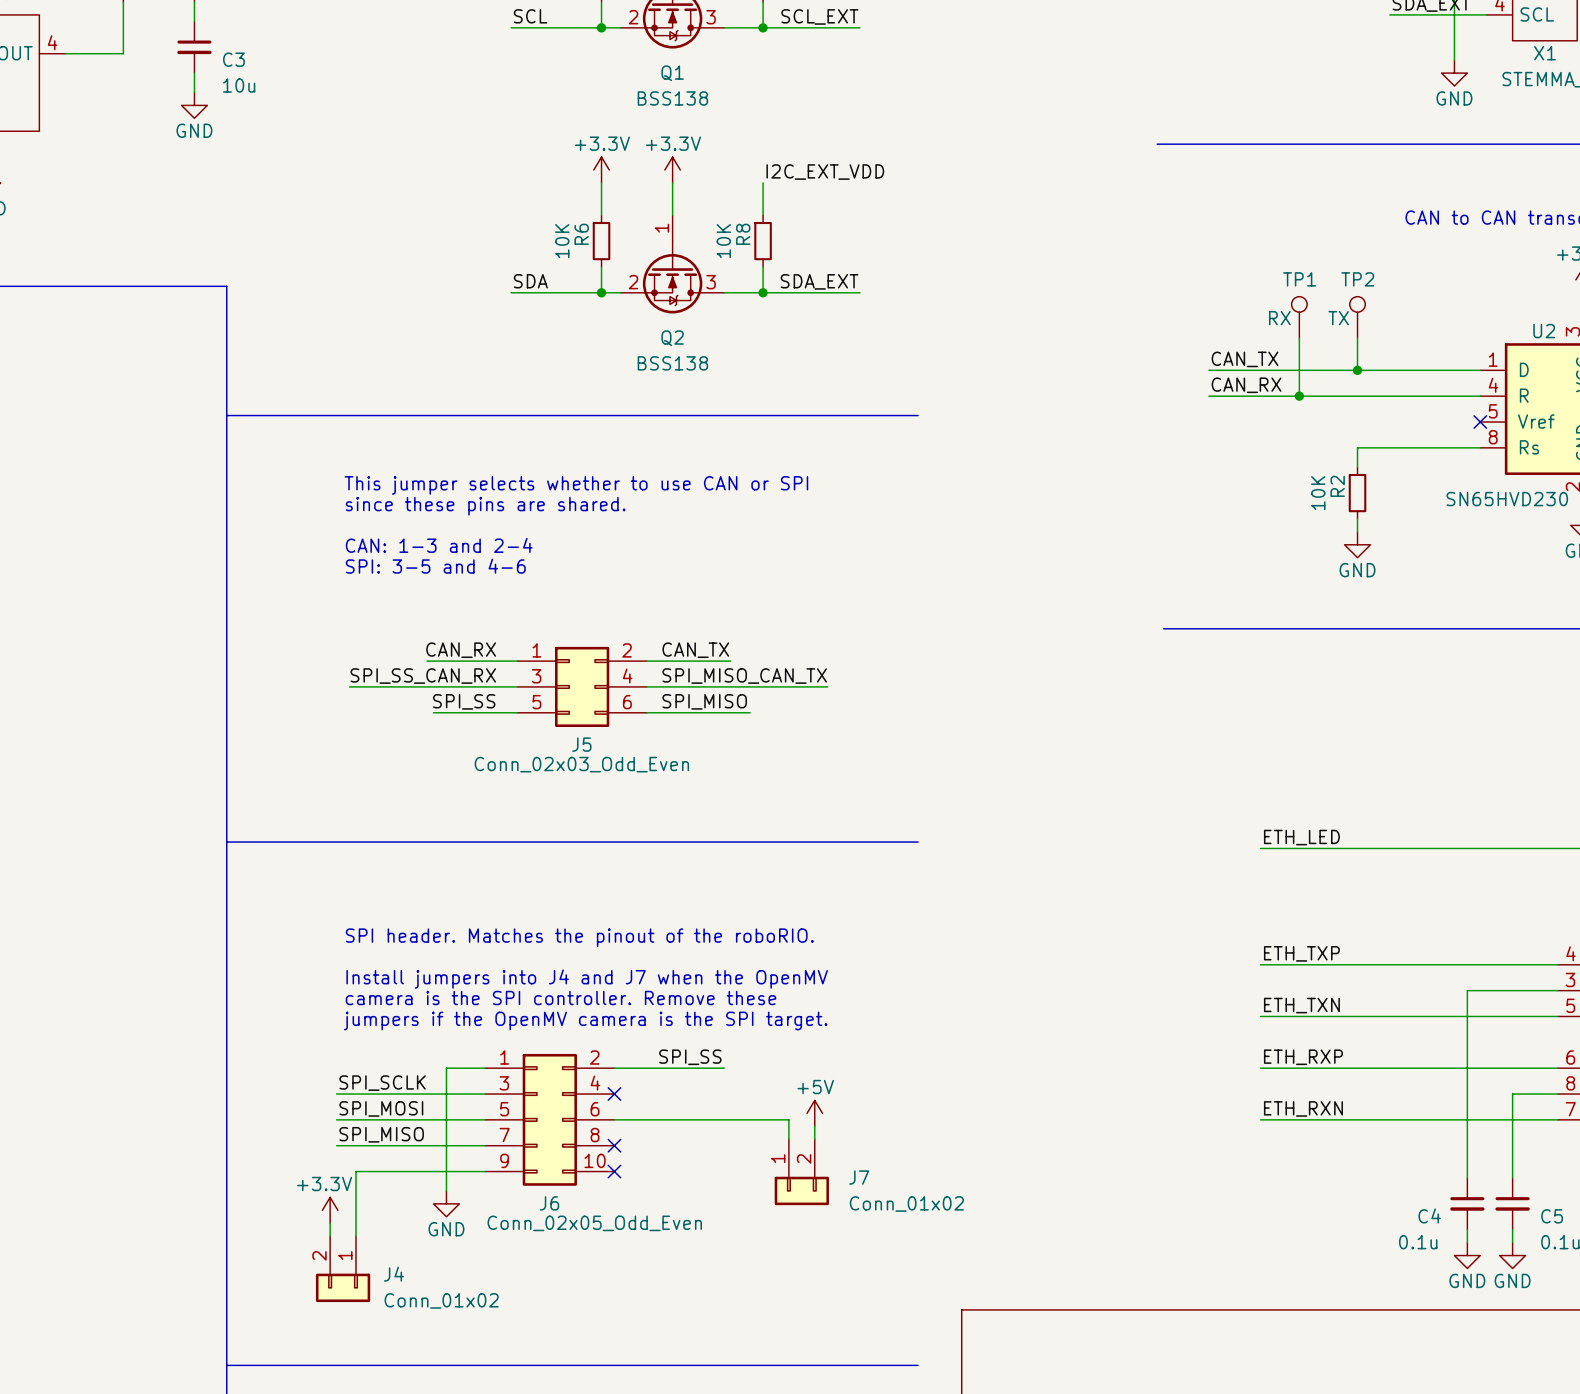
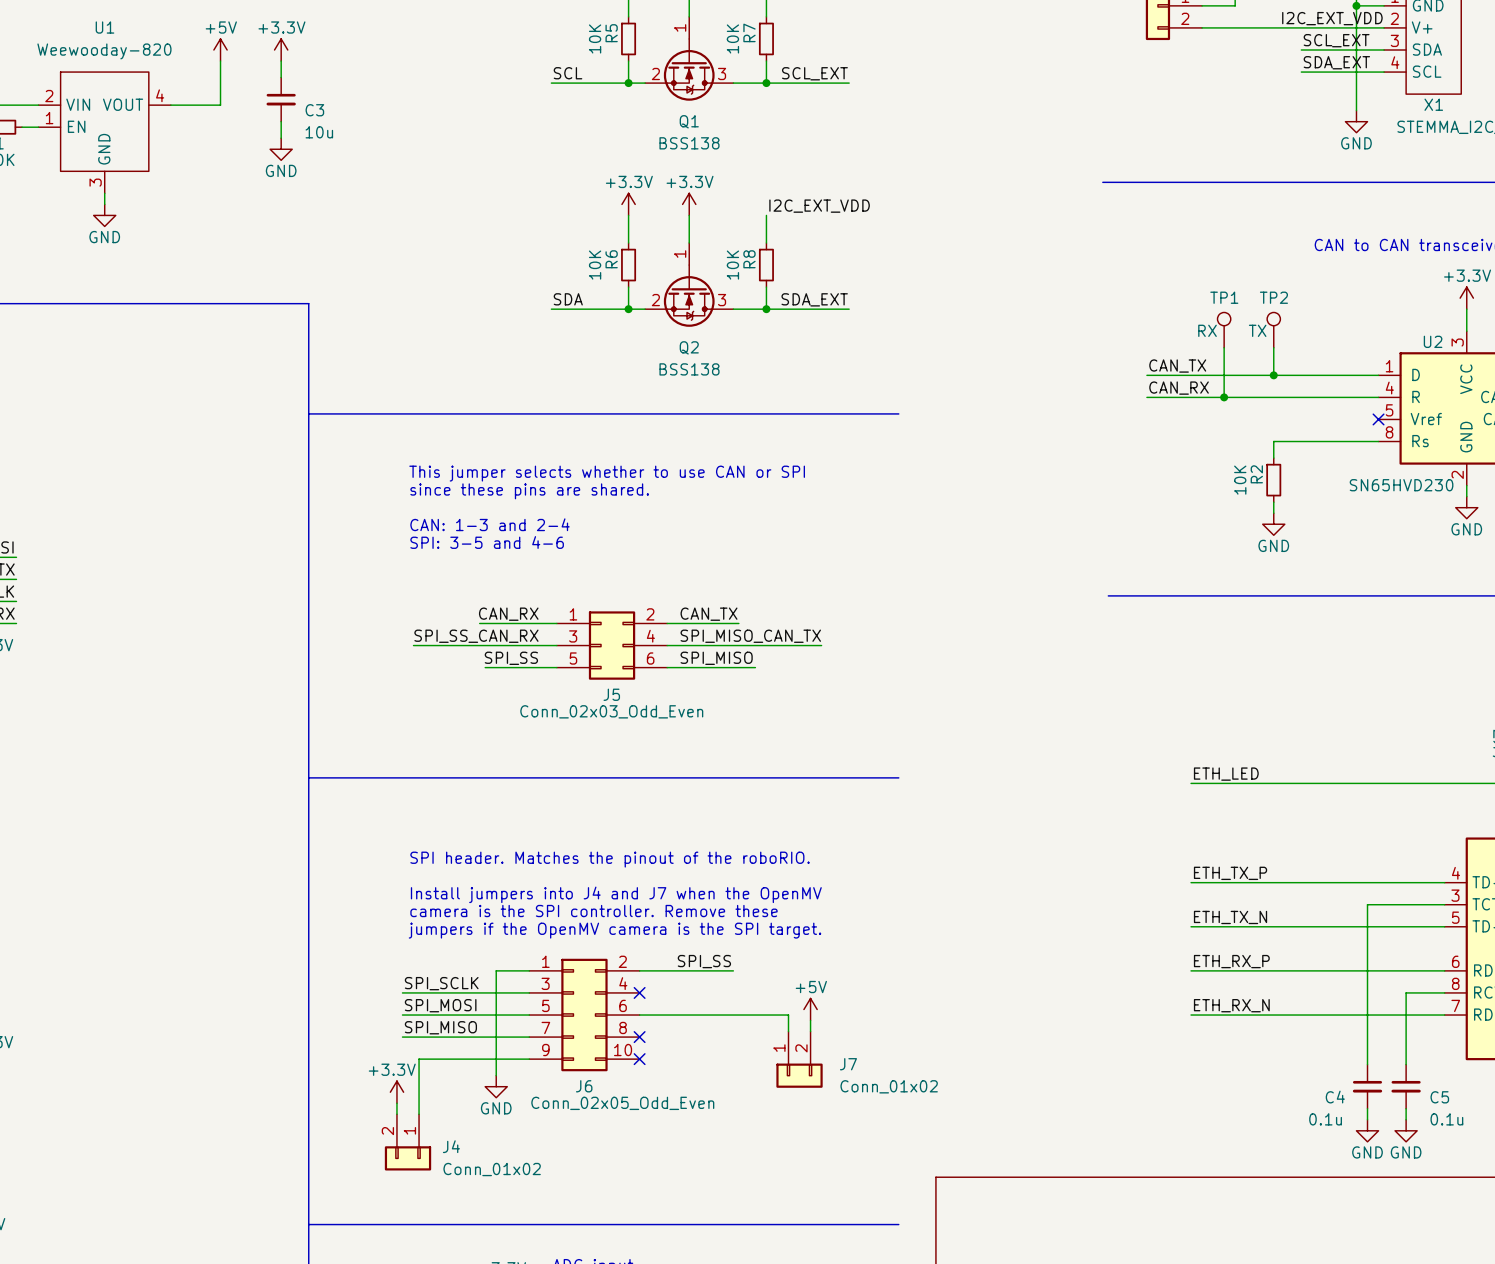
label: ETH_TXP (1301, 953) -> ETH_TX_P (1230, 873)
label: ETH_TXN (1301, 1005) -> ETH_TX_N (1230, 917)
label: ETH_RXP (1303, 1057) -> ETH_RX_P (1231, 961)
label: ETH_RXN (1303, 1108) -> ETH_RX_N (1231, 1005)

